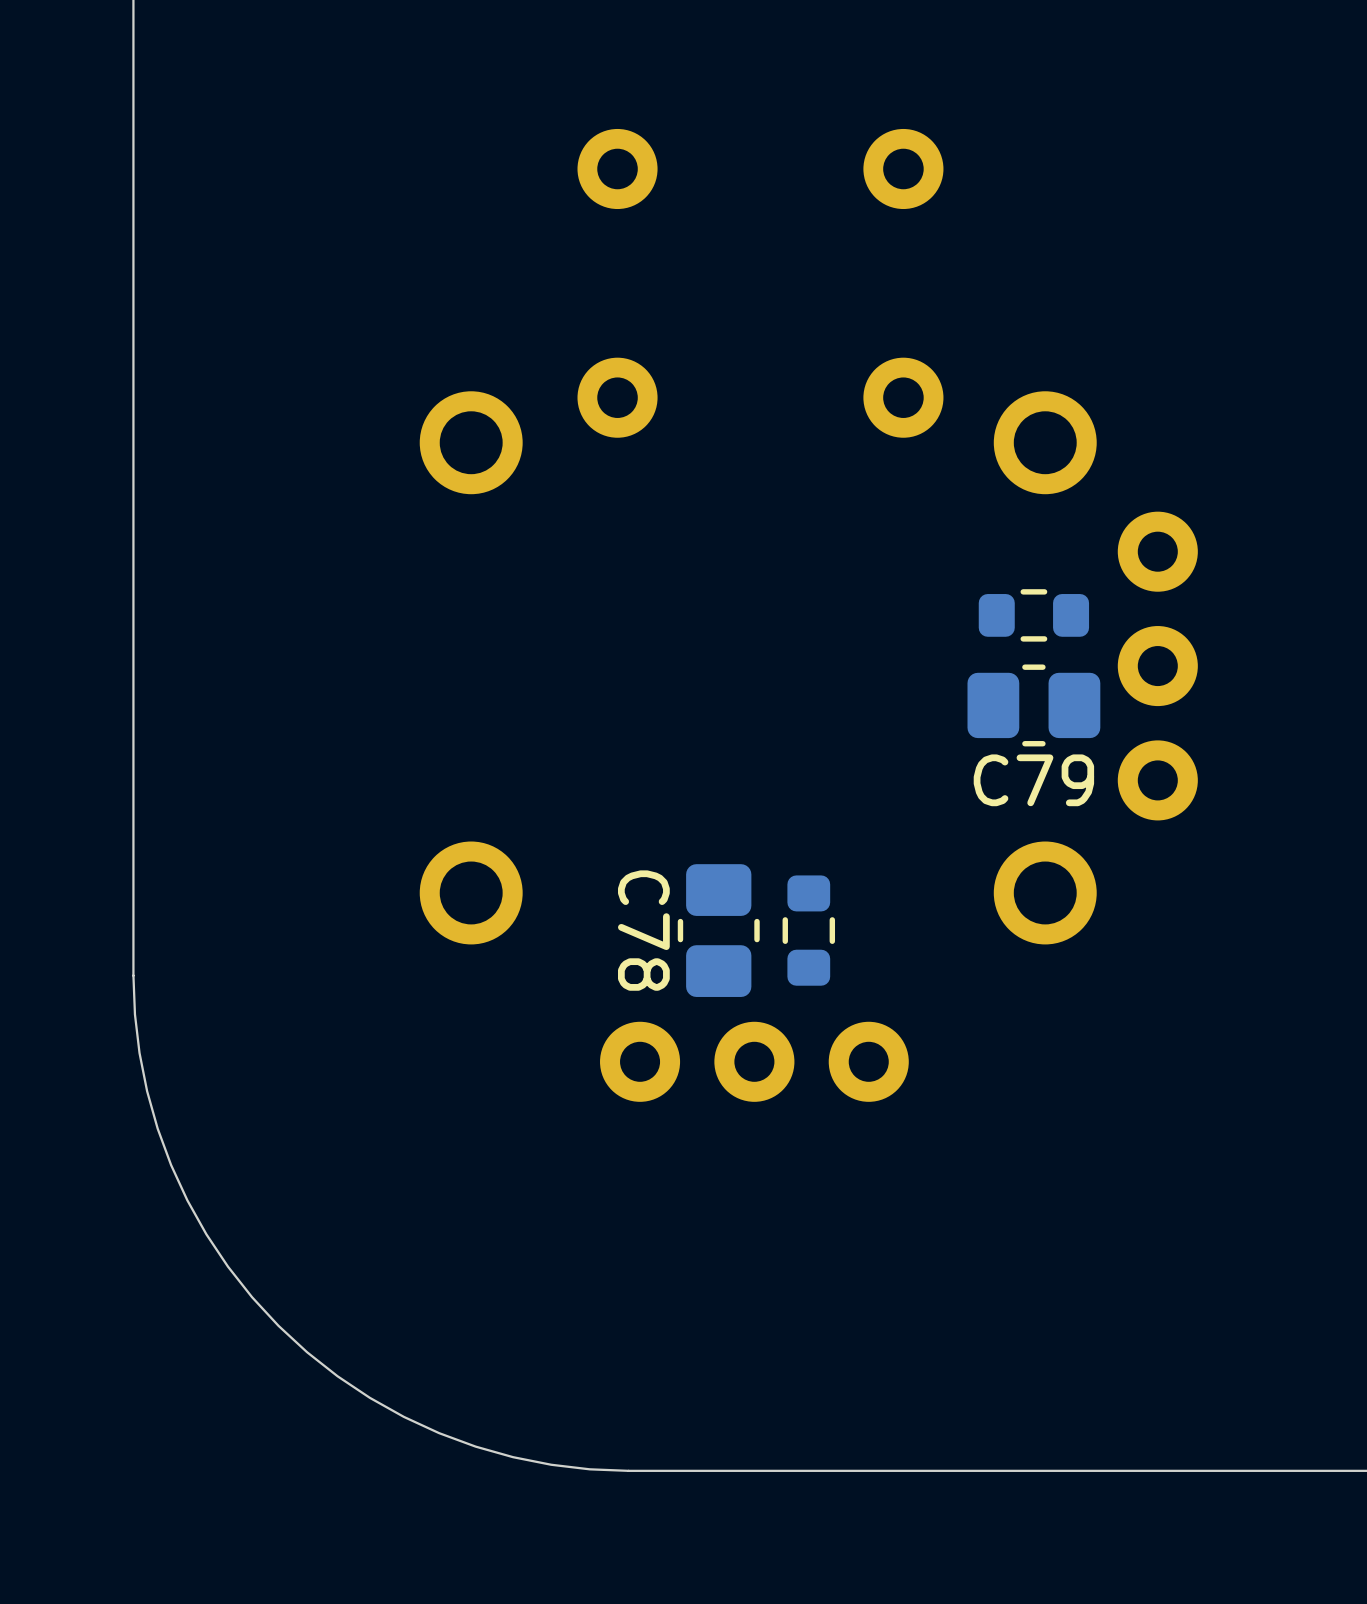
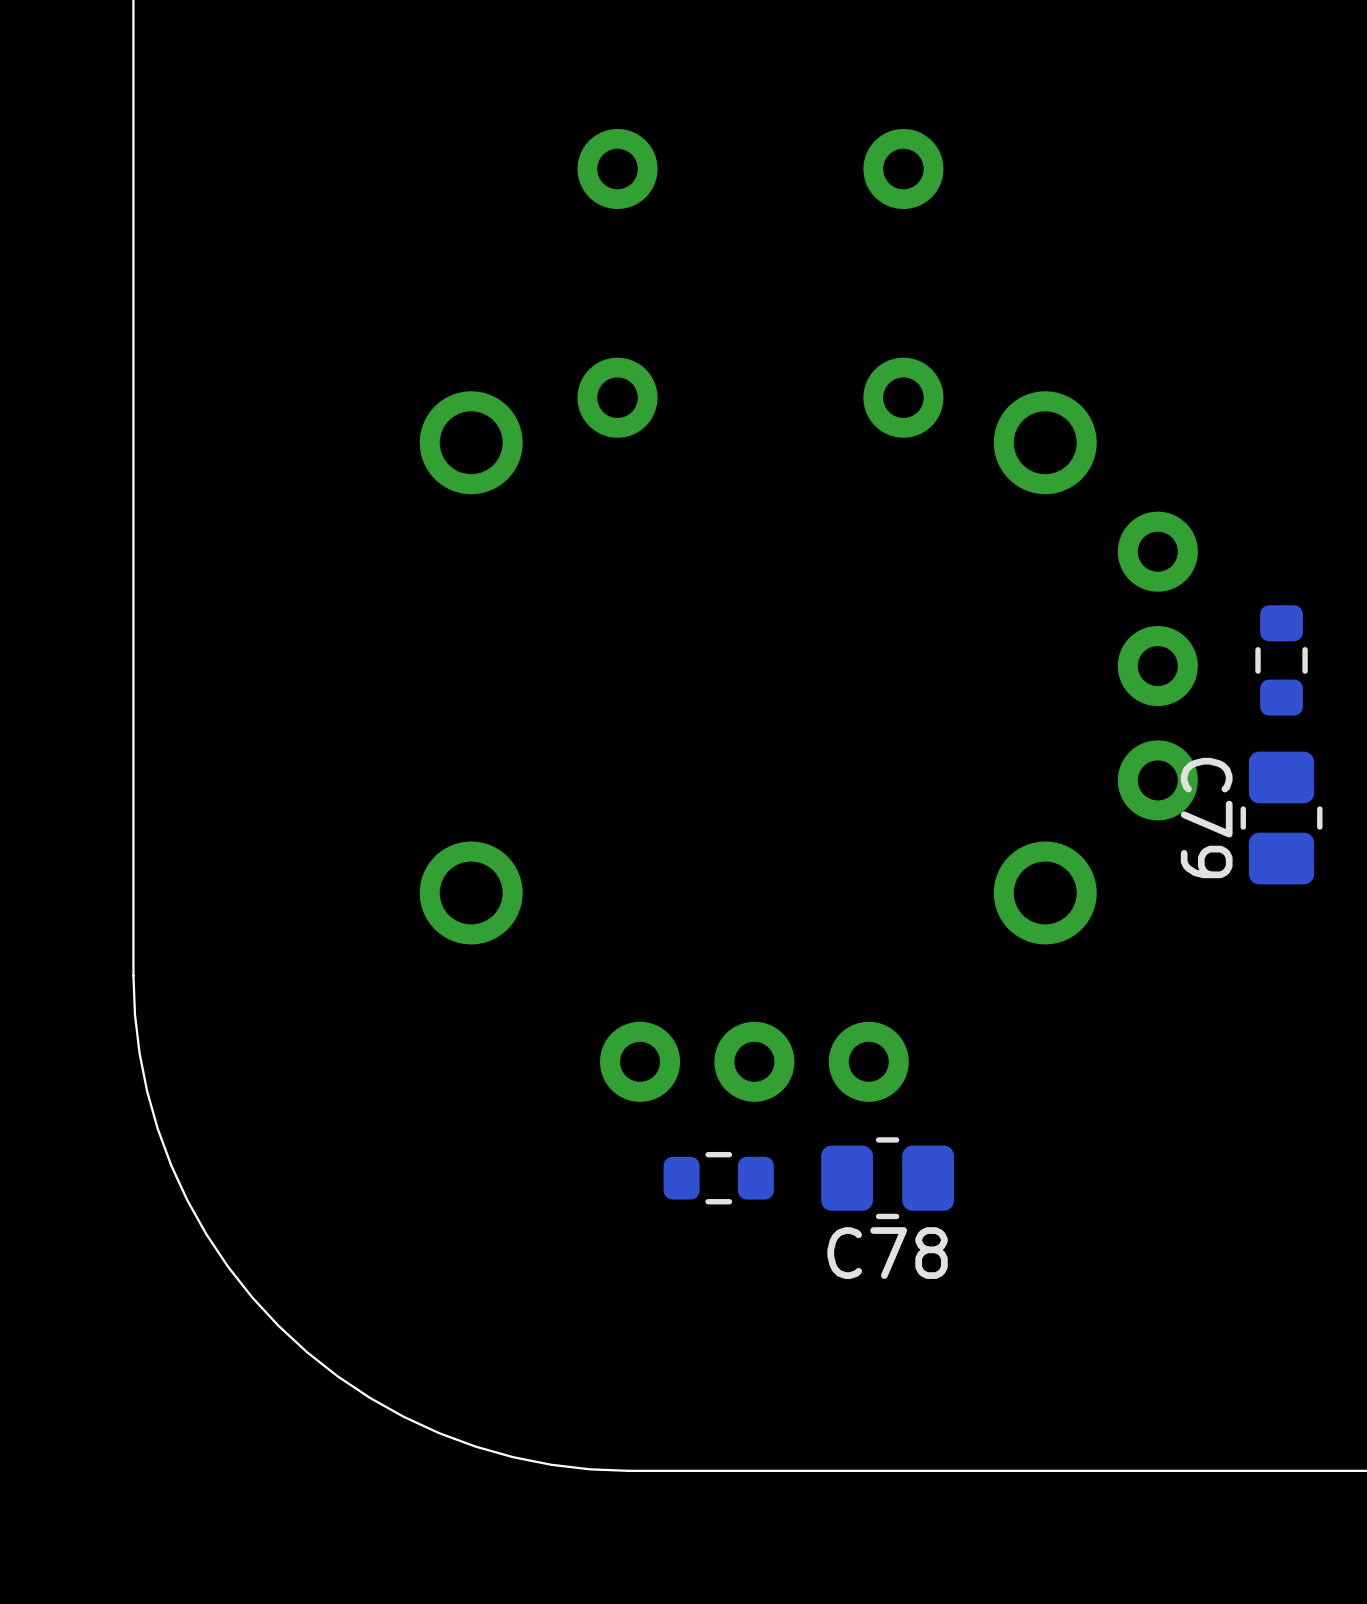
part rotation: 0° (1033, 615) -> 90° clockwise (1281, 660)
part position: (1033, 615) -> (1281, 660)
C79 rotation: 0° (1033, 705) -> 90° clockwise (1281, 818)
C79 position: (1033, 705) -> (1281, 818)
C78 name position: C78 (643, 930) -> C78 (887, 1253)
C78 rotation: 0° (718, 930) -> 90° clockwise (887, 1178)
C78 position: (718, 930) -> (887, 1178)
part rotation: 0° (808, 930) -> 90° clockwise (718, 1178)
part position: (808, 930) -> (718, 1178)

